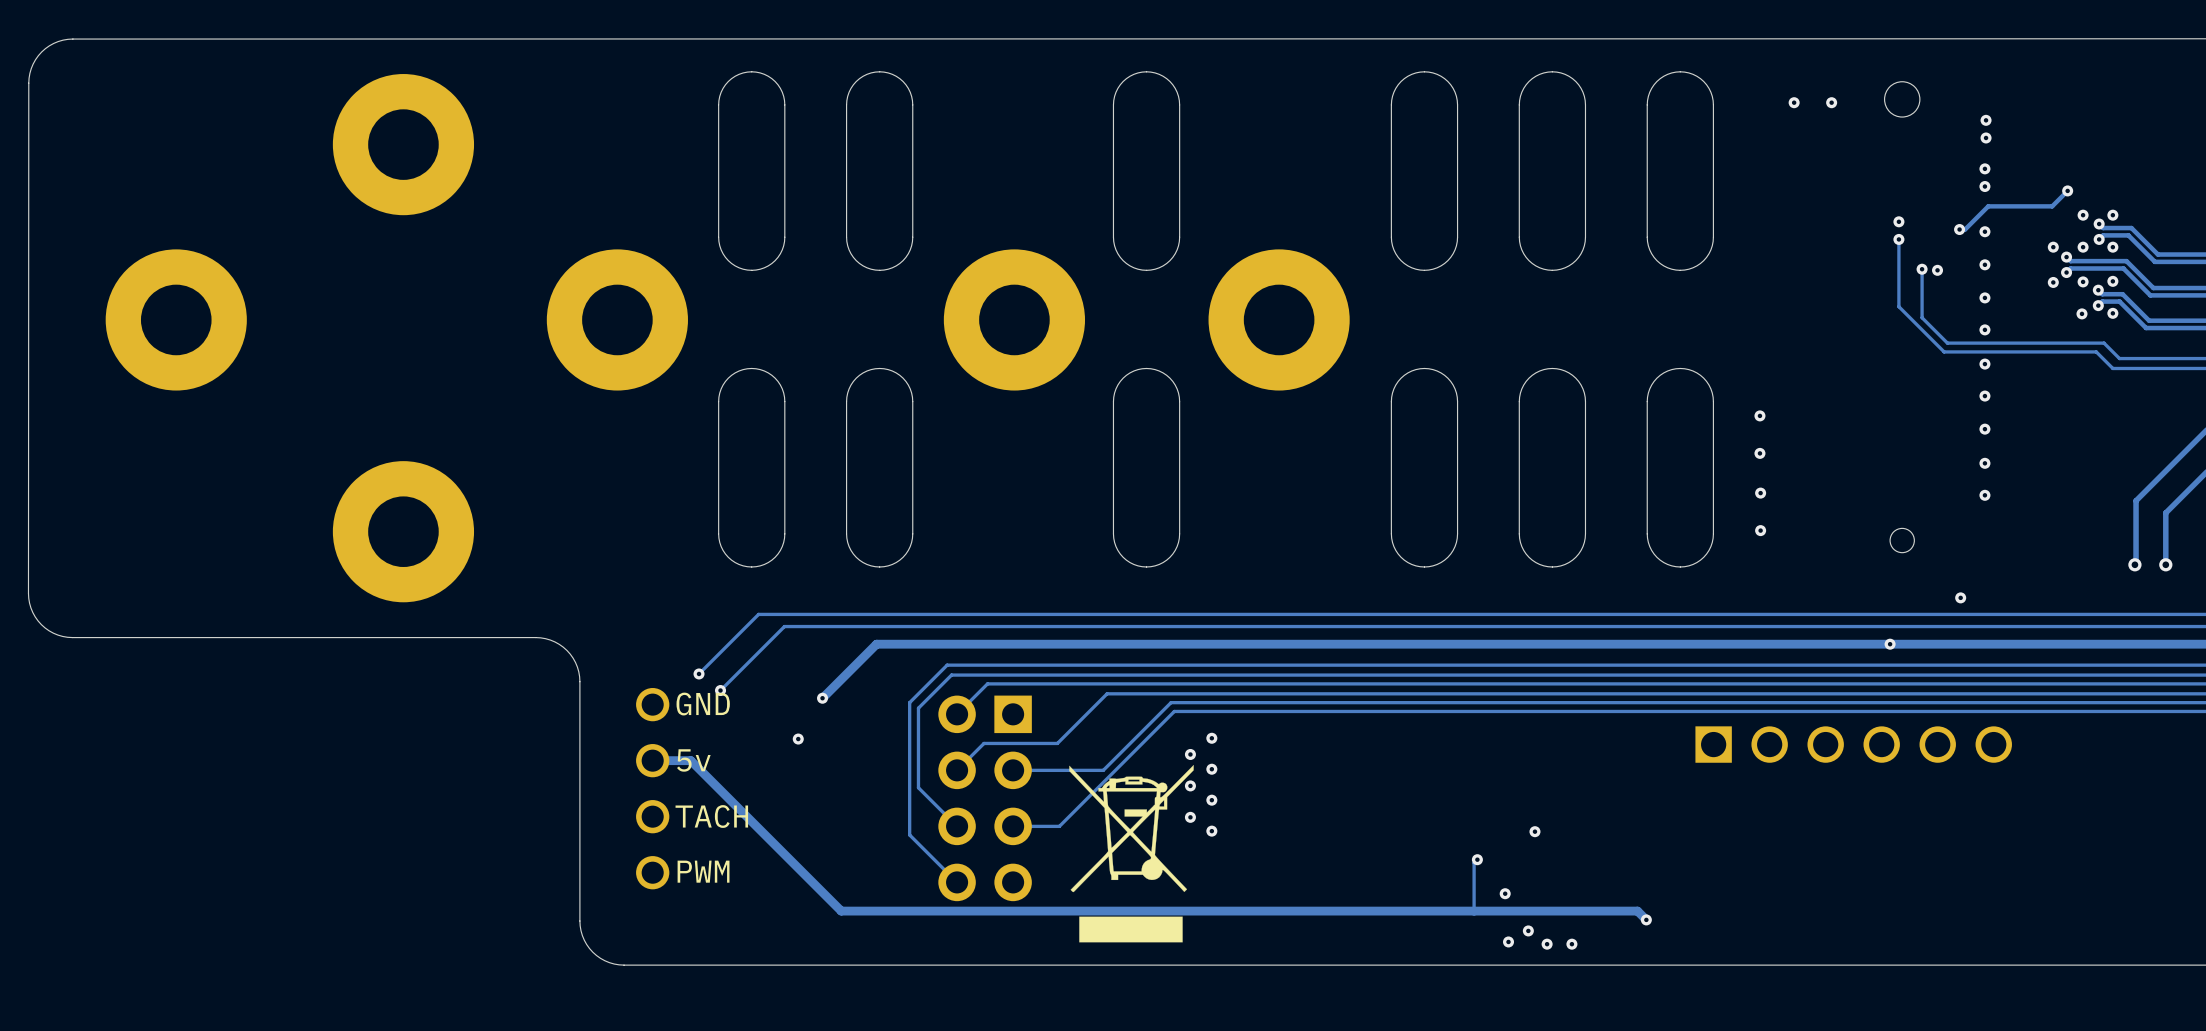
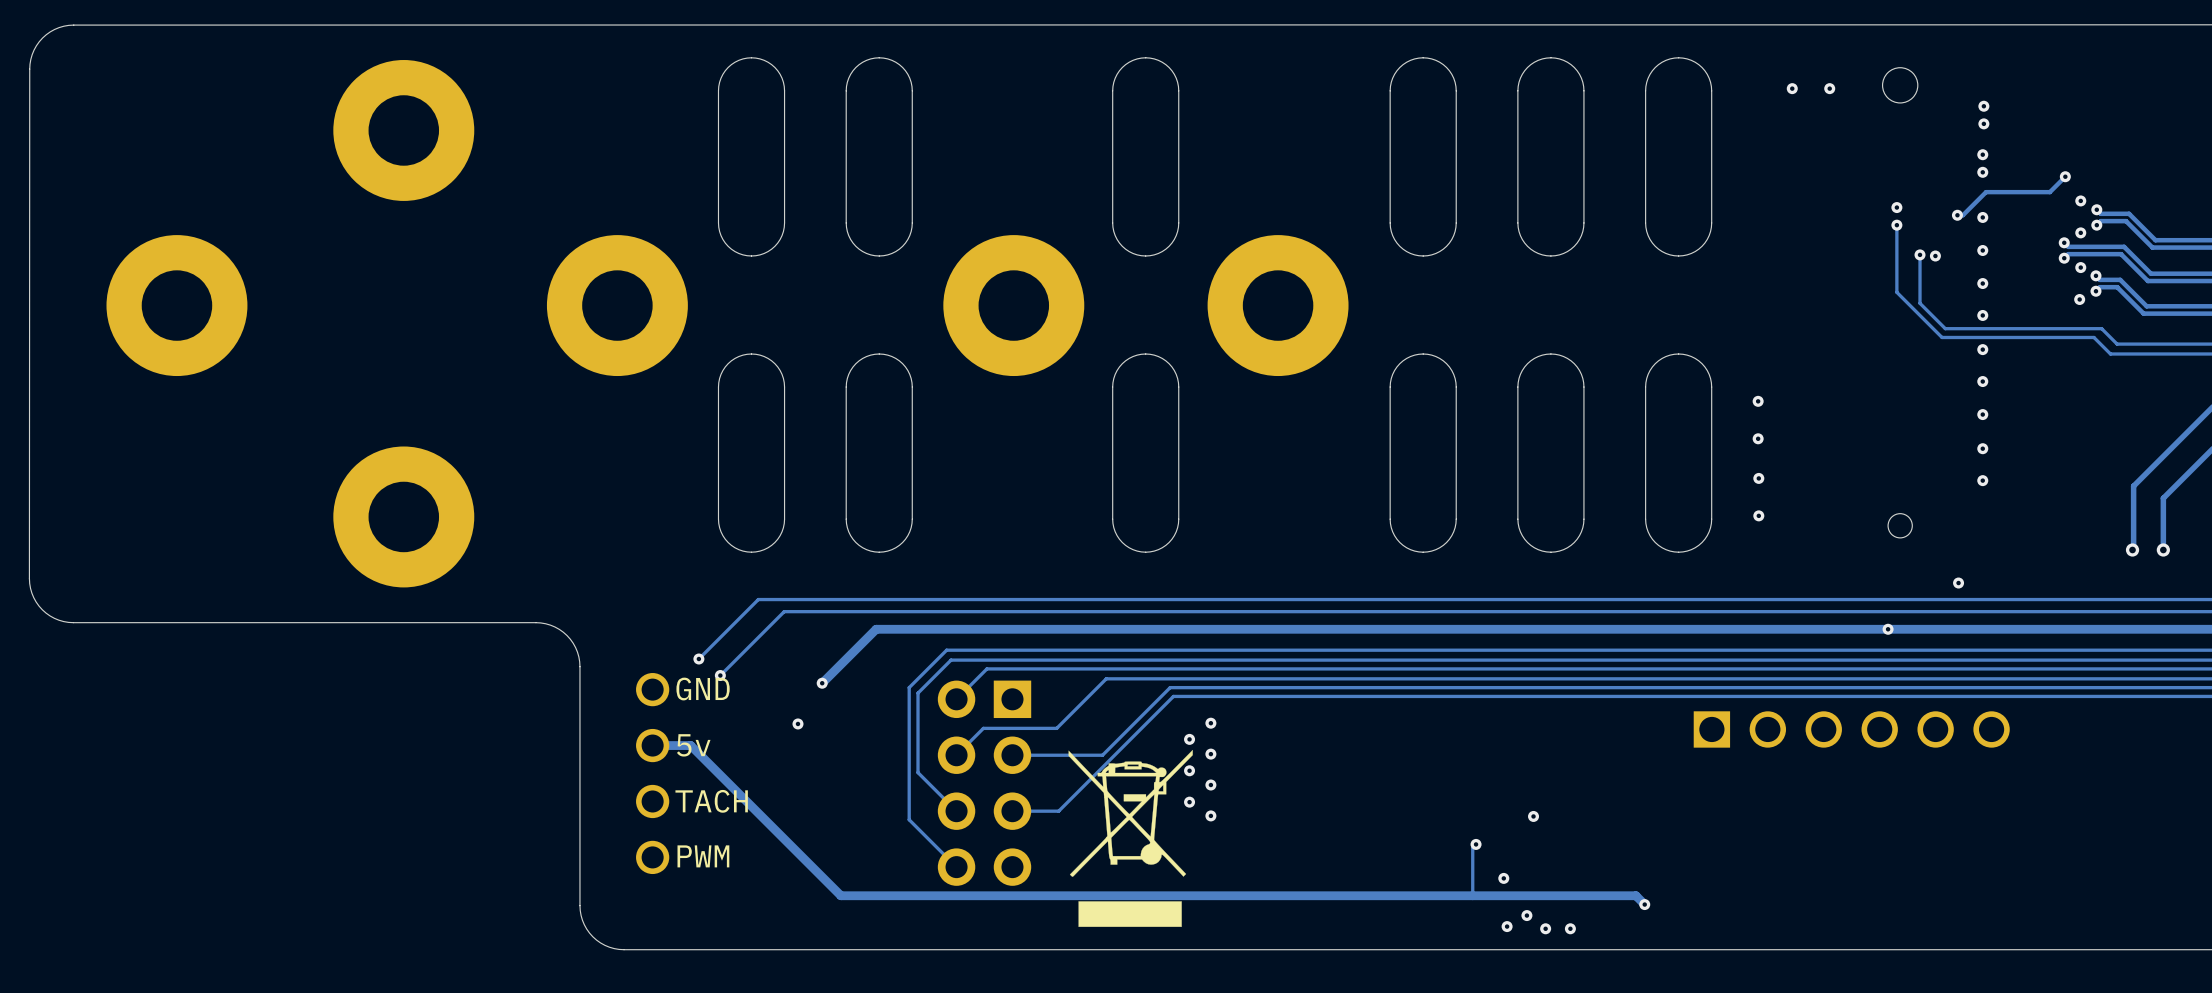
via: (2112, 215) -> none
via: (2053, 247) -> none
via: (2112, 247) -> none
via: (2112, 281) -> none
via: (2053, 282) -> none
via: (2112, 313) -> none

